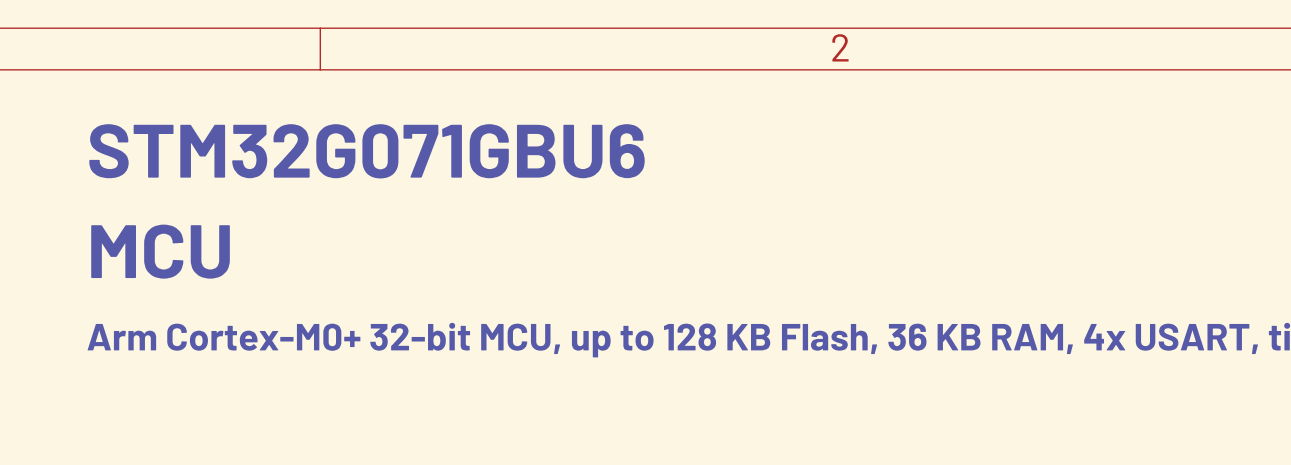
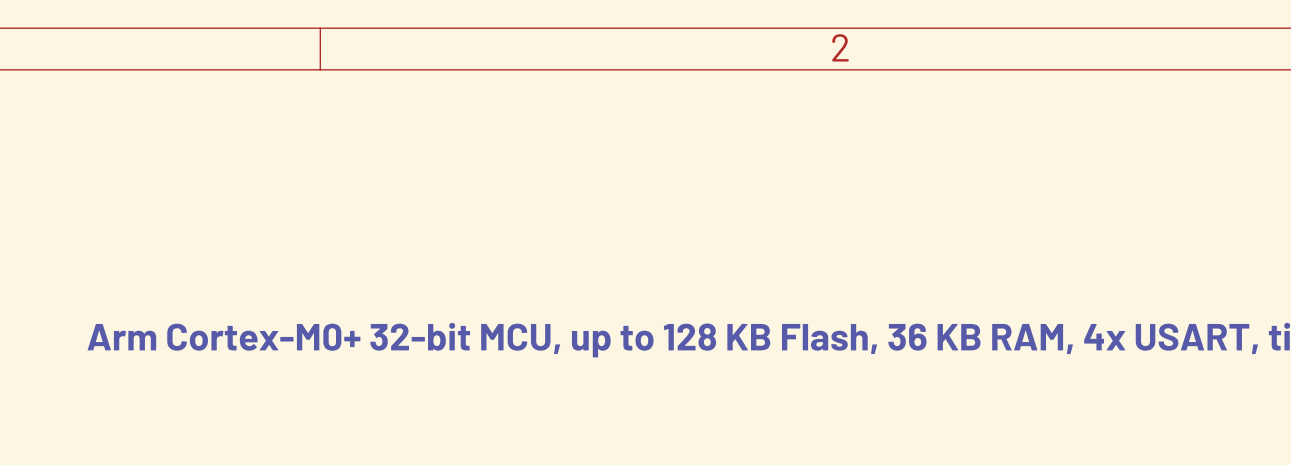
text: STM32G071GBU6 (367, 151) -> none
text: MCU (160, 251) -> none

